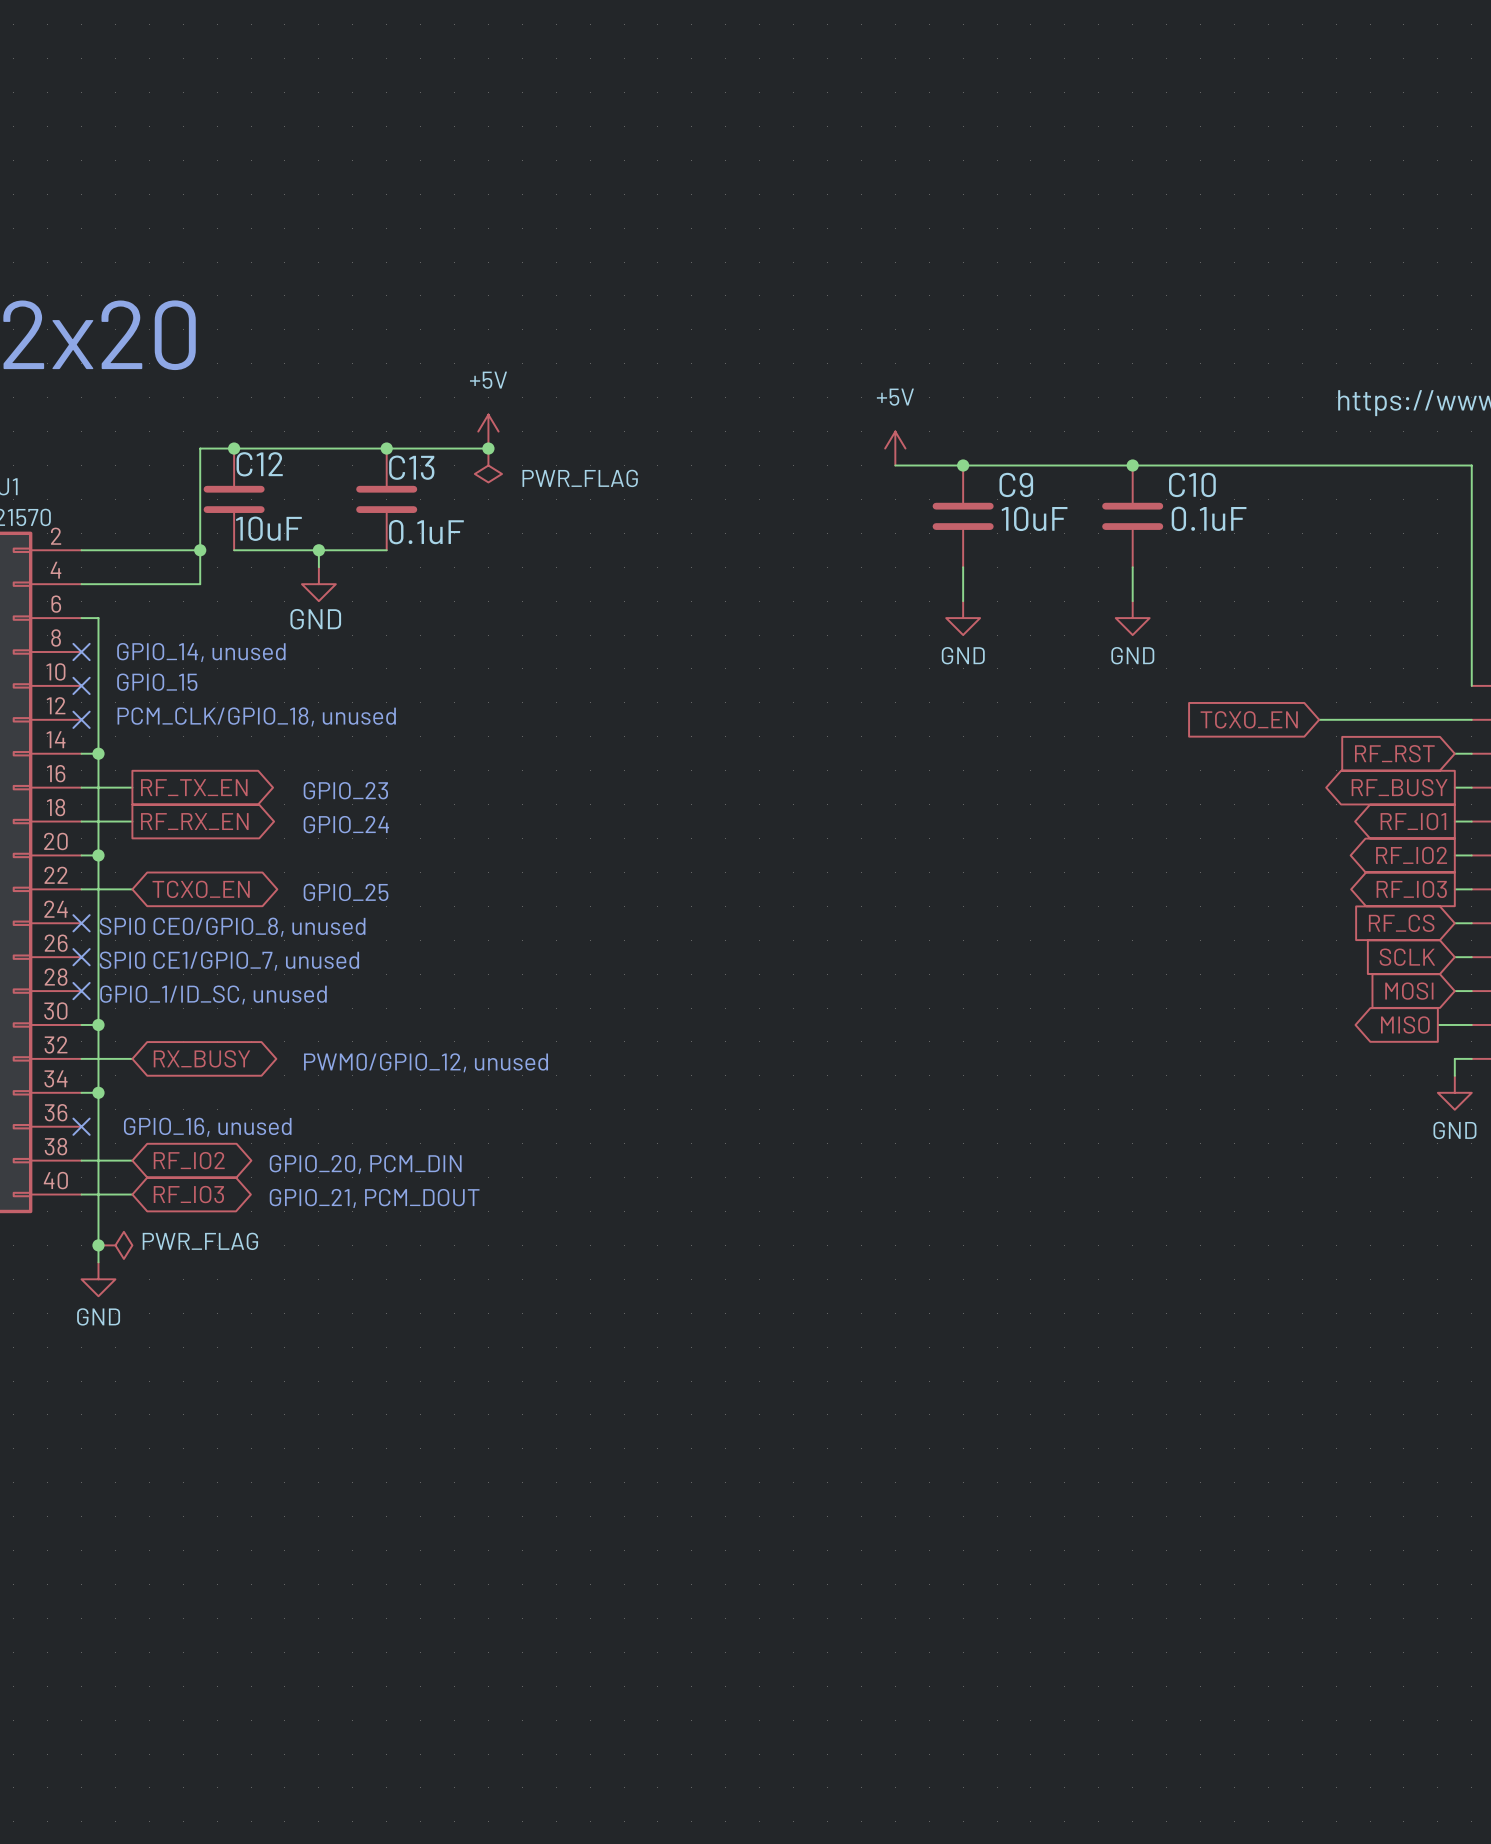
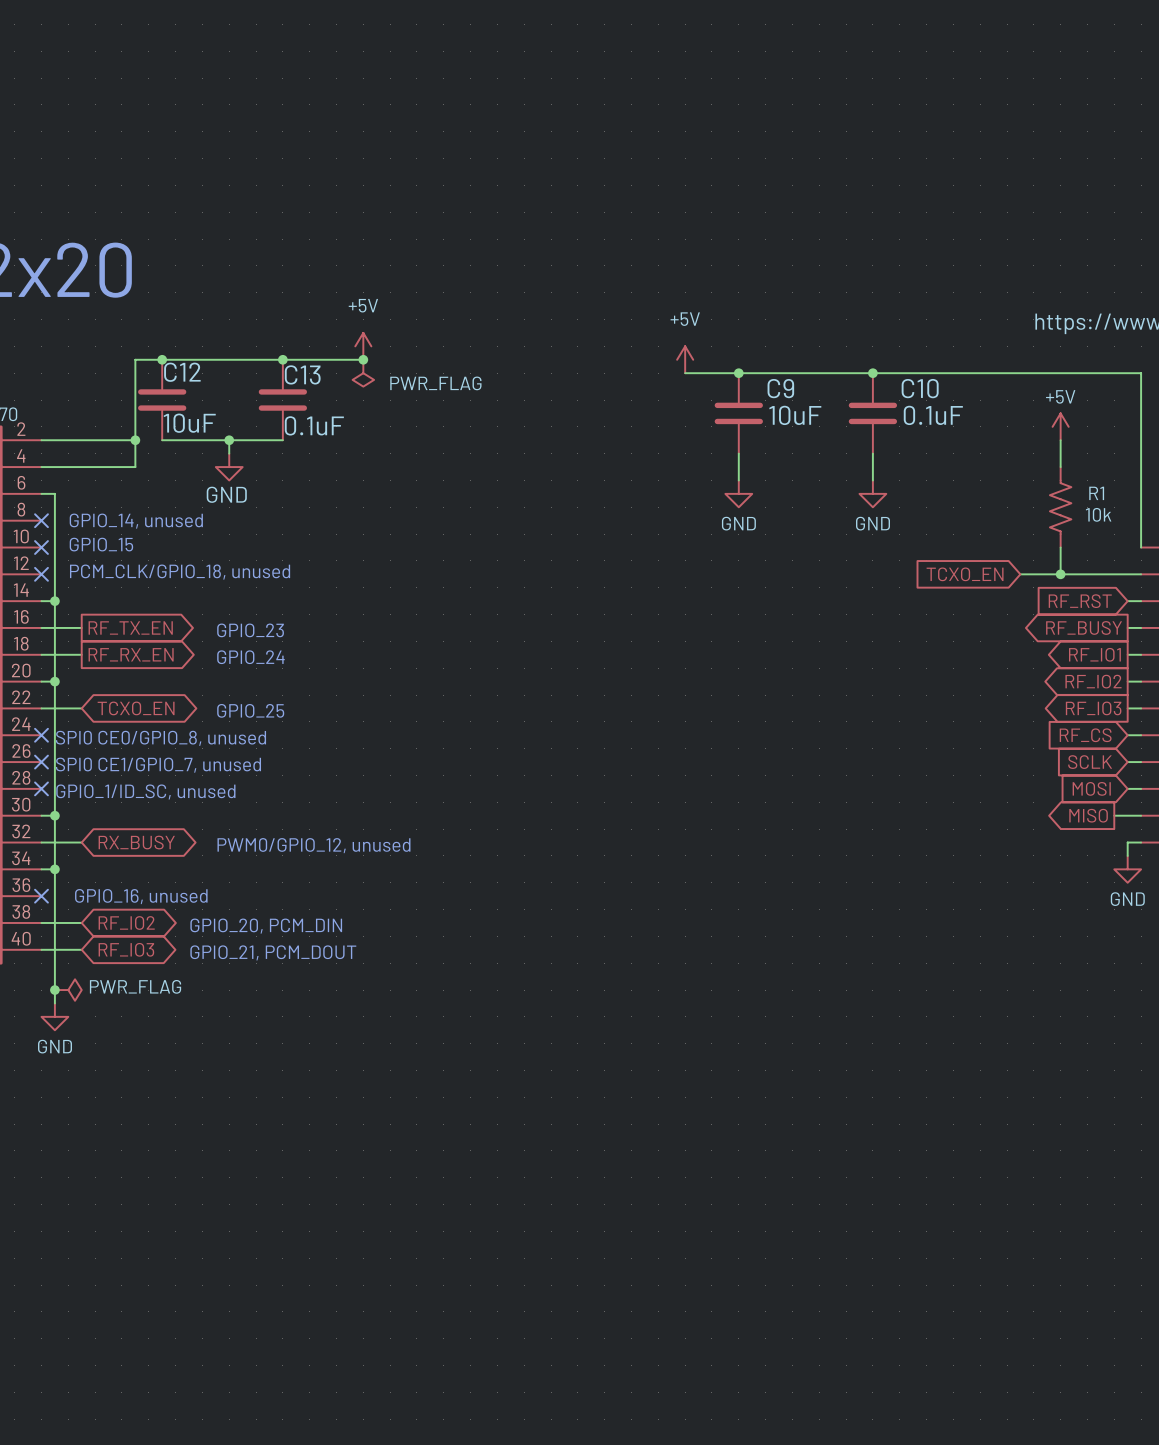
power symbol: none -> +5V (1060, 426)
wire: none -> (1060, 440) (1060, 467)
R1: none -> 10k (1060, 507)
wire: none -> (1060, 547) (1060, 574)
junction: none -> (1060, 574)

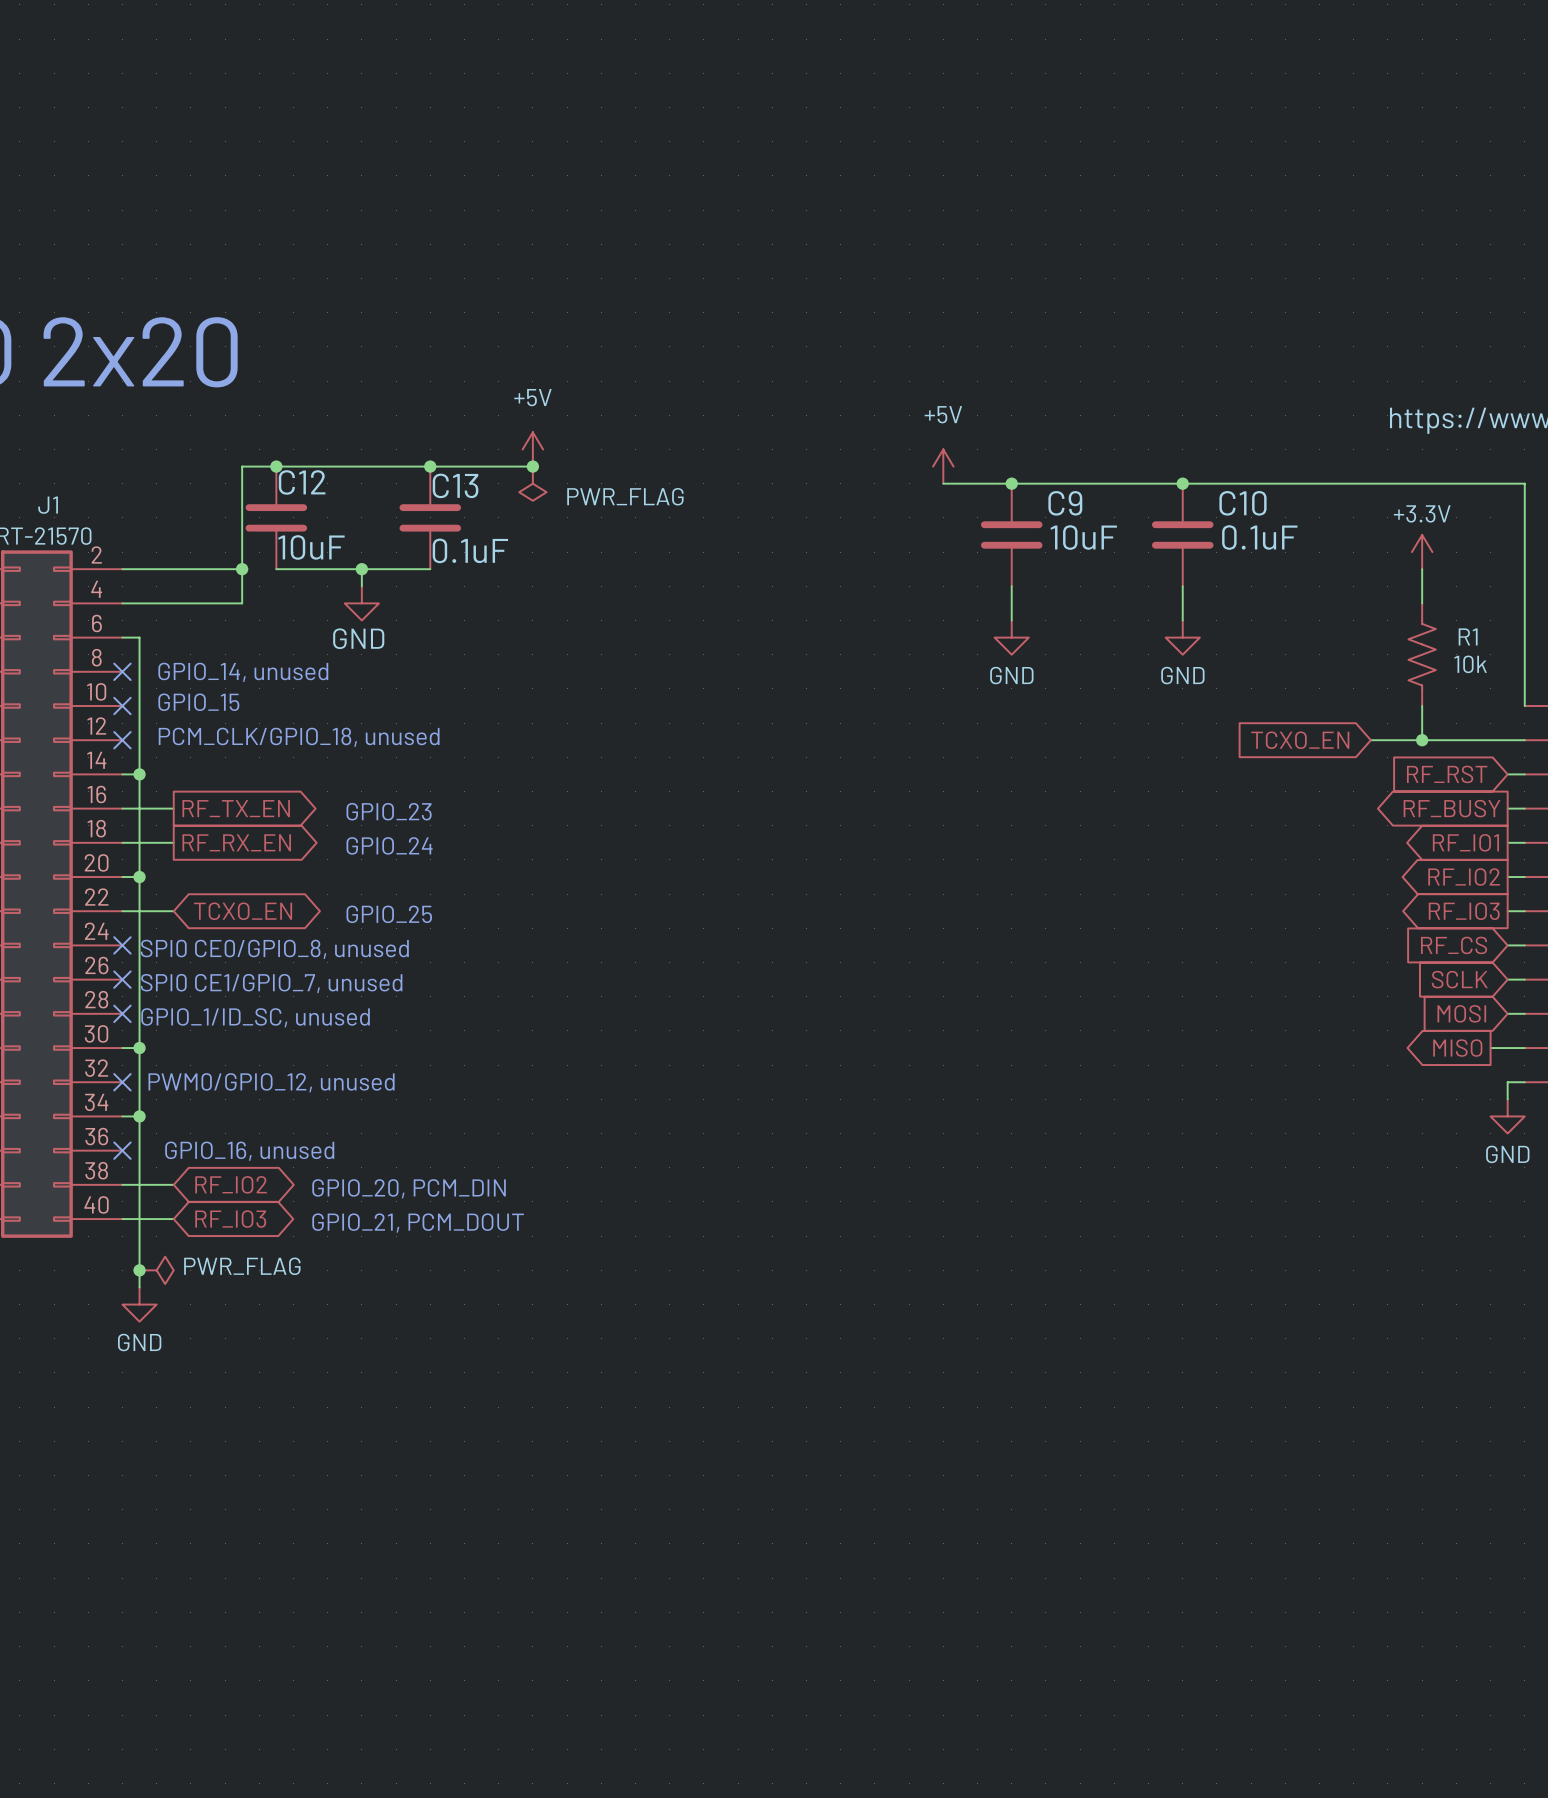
power symbol: +5V (1060, 426) -> +3.3V (1422, 552)
wire: (41, 842) (81, 842) -> none
no-connect mark: none -> (122, 1082)
global label: RX_BUSY (136, 842) -> none
text position: PWM0/GPIO_12, unused (313, 845) -> PWM0/GPIO_12, unused (271, 1082)

